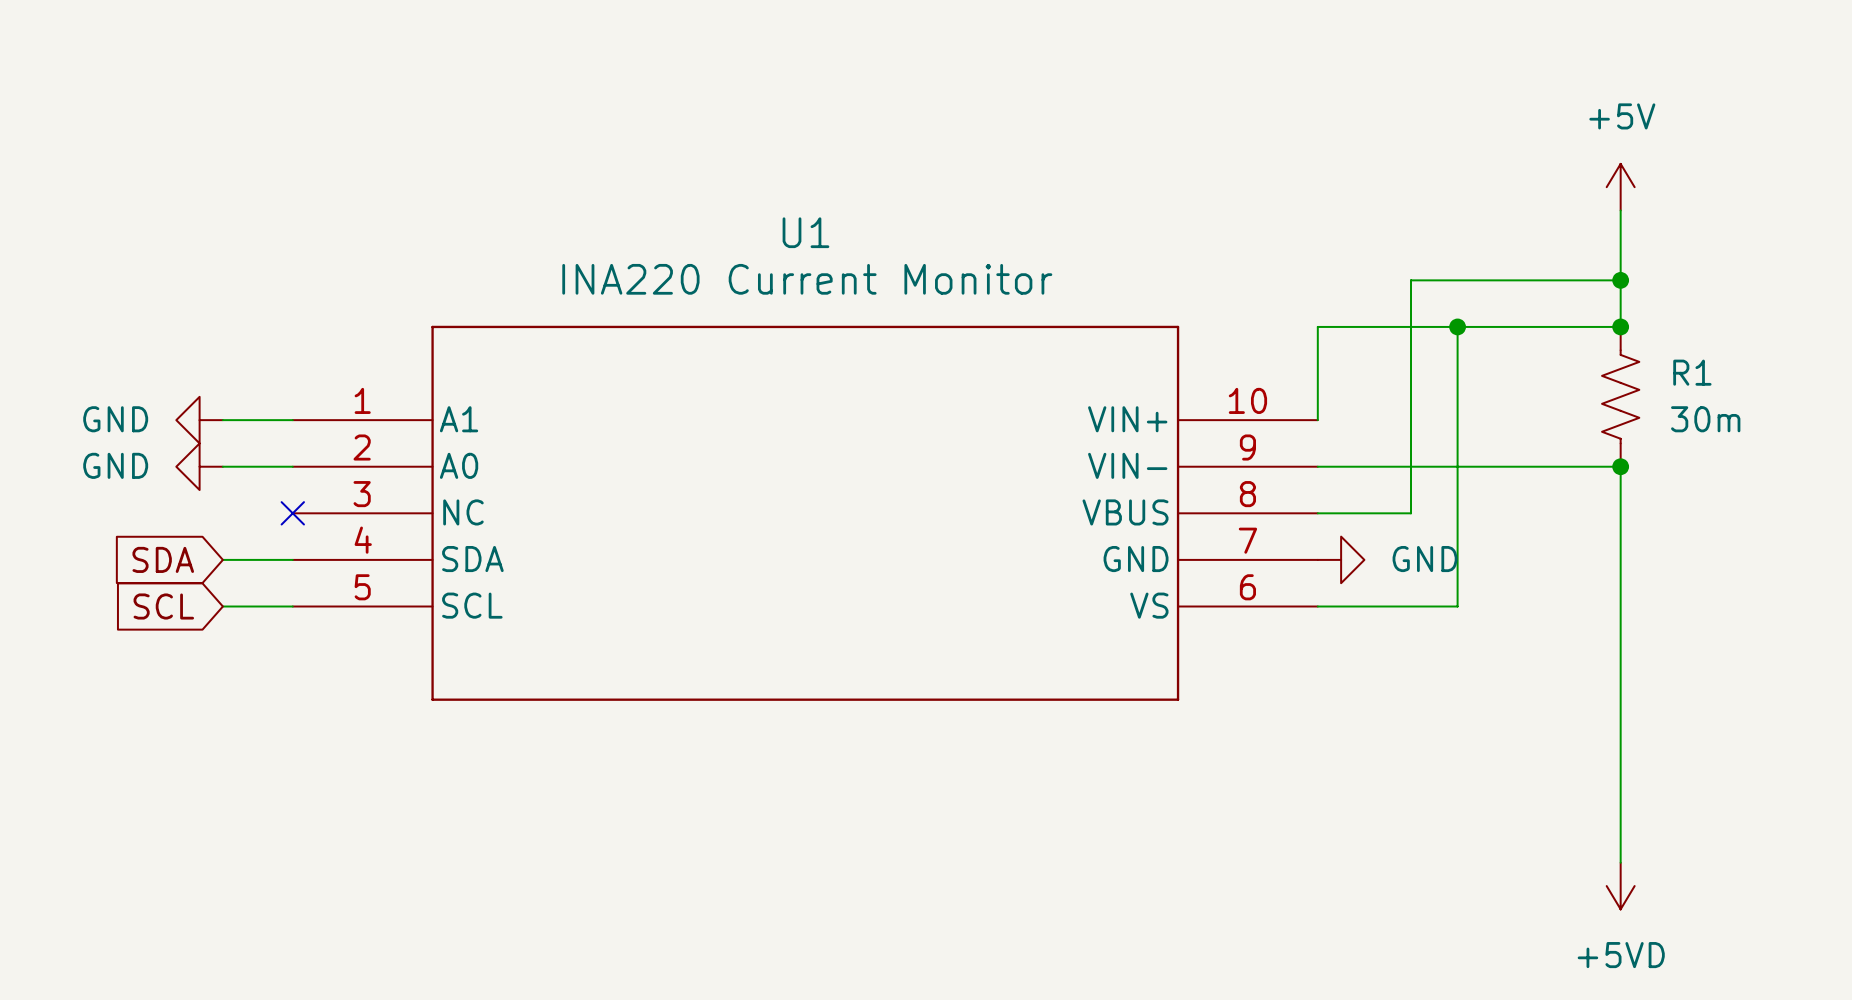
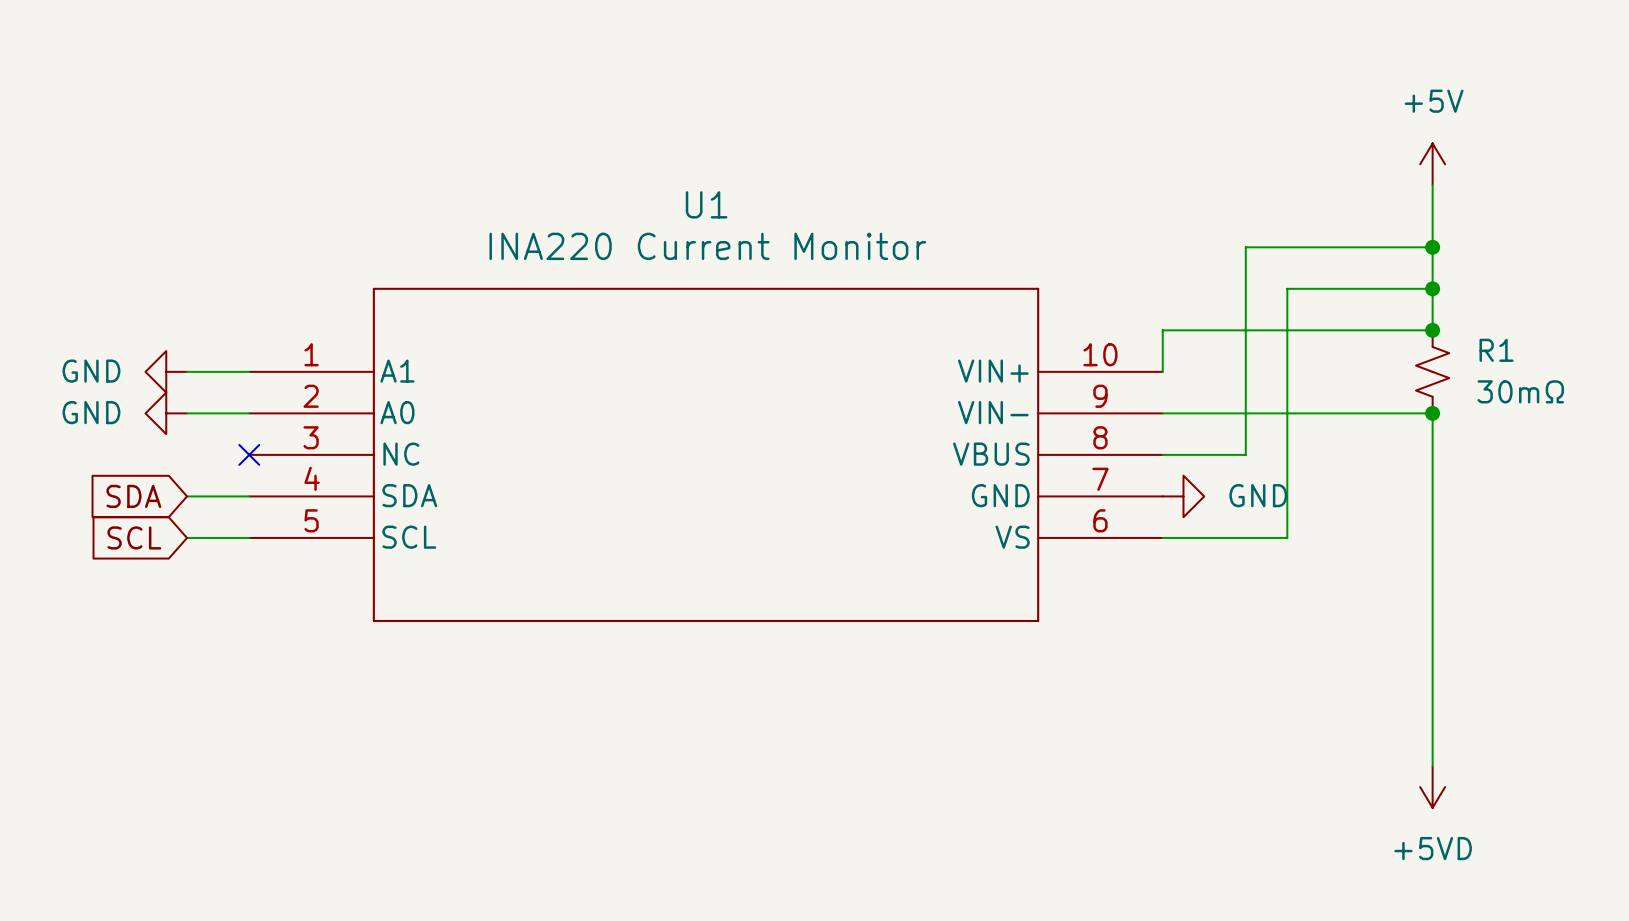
wire: (1457, 326) (1317, 326) (1317, 373) -> (1432, 288) (1432, 330) (1162, 330)
junction: (1457, 326) -> none
R1 symbol: [1602, 326, 1640, 467] -> [1416, 330, 1450, 414]
junction: none -> (1432, 330)
R1 value: 30m (1705, 419) -> 30mΩ (1520, 391)

